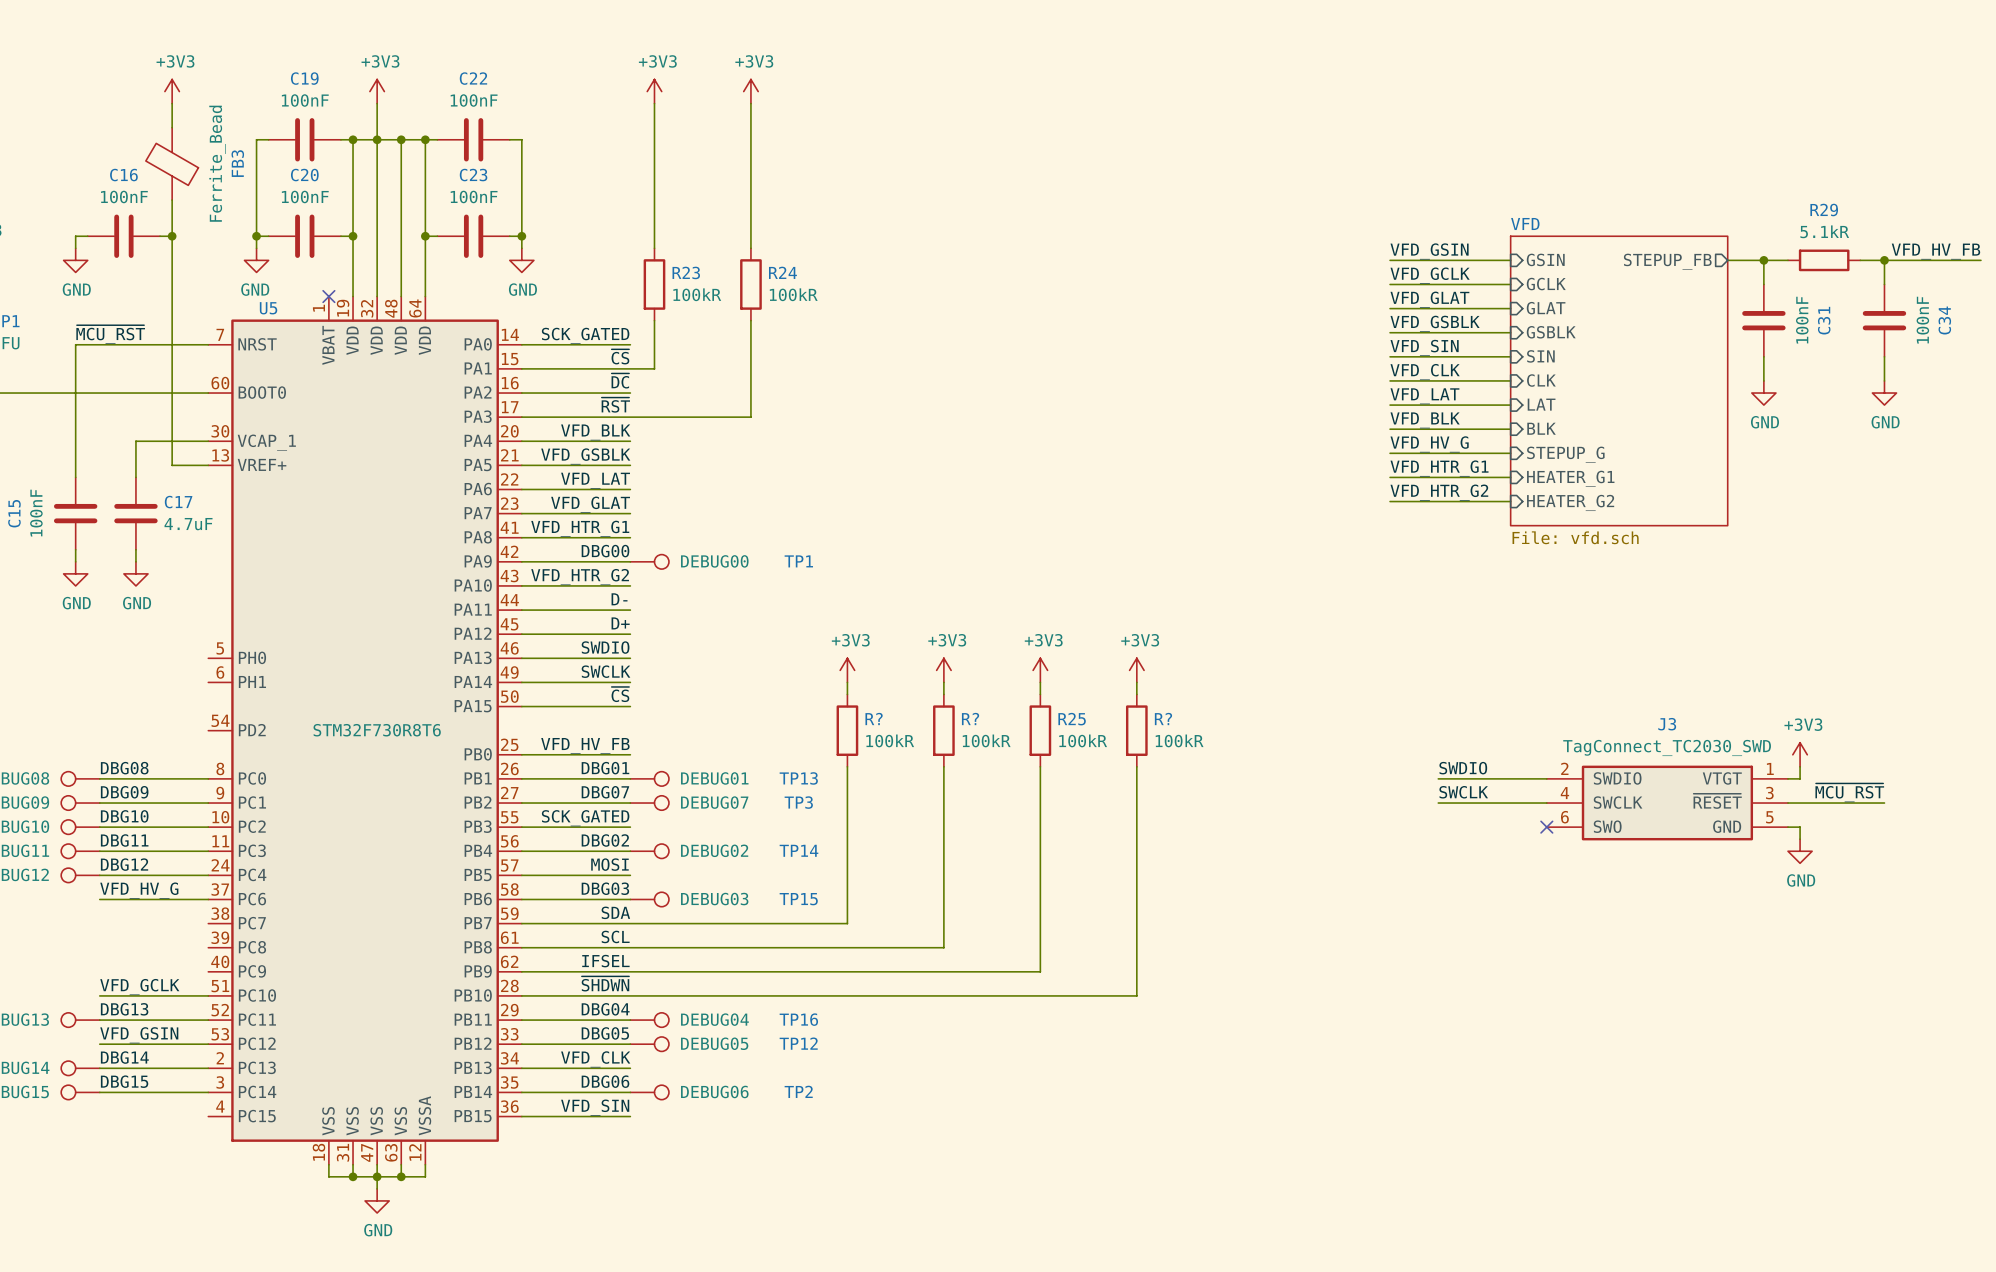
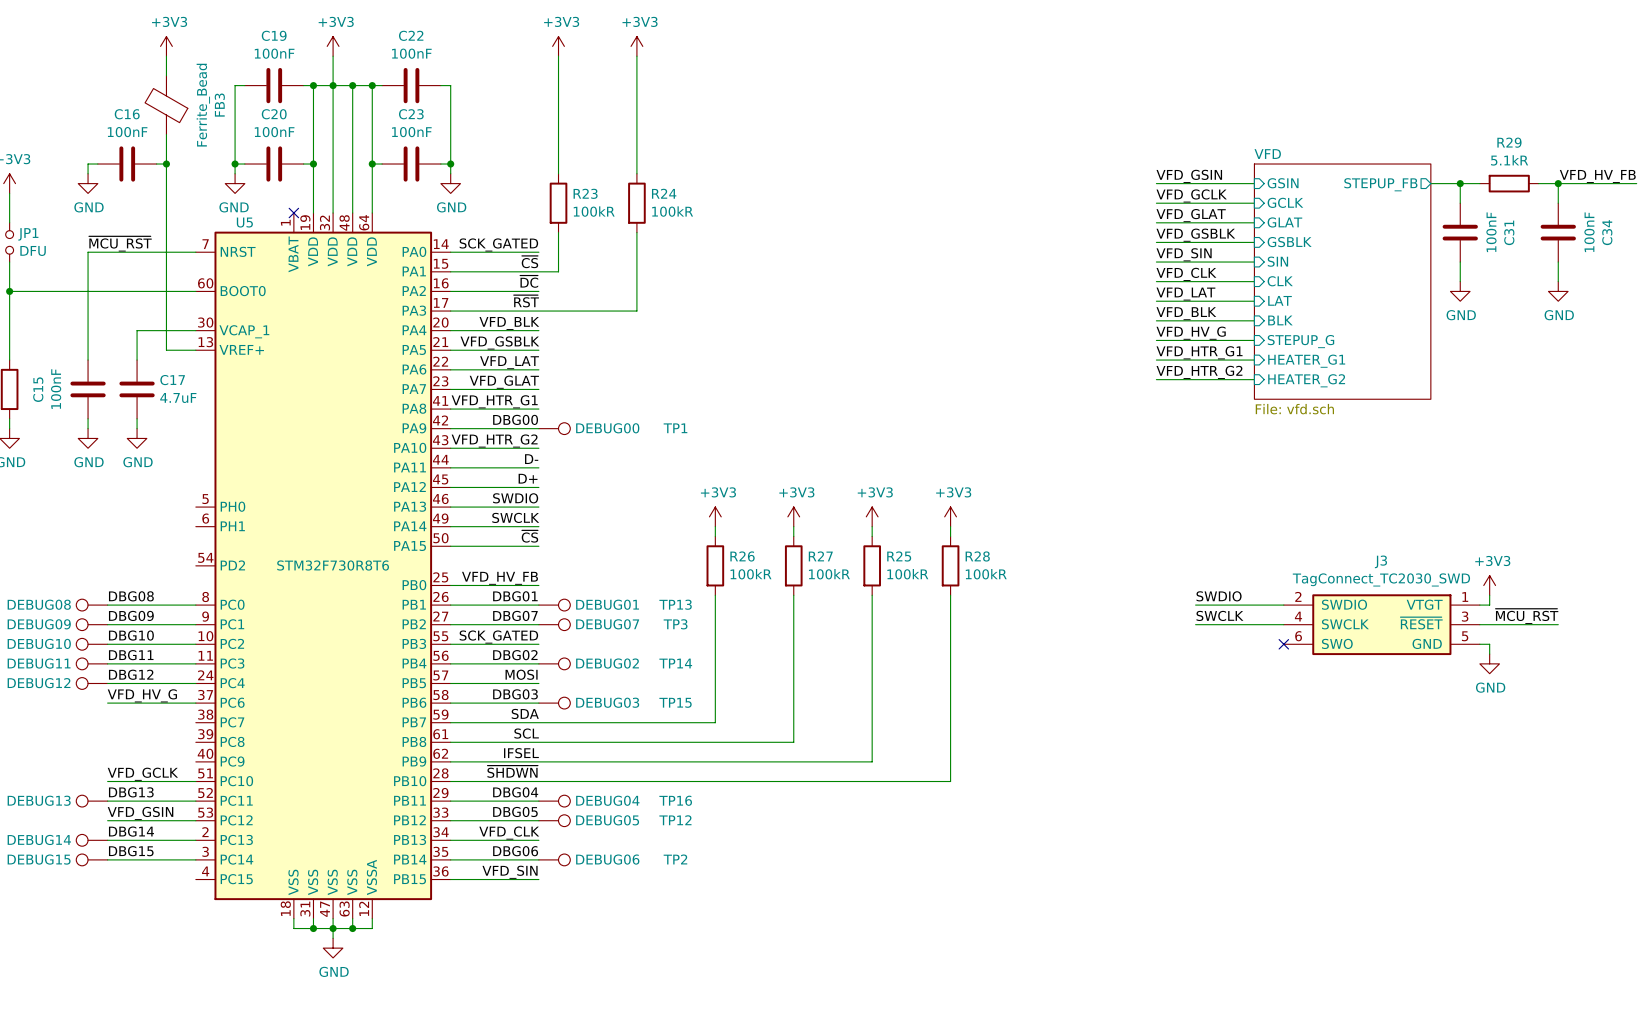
R? name: R? (874, 719) -> R26 (742, 556)
R? name: R? (970, 719) -> R27 (820, 556)
R? name: R? (1163, 719) -> R28 (977, 556)

